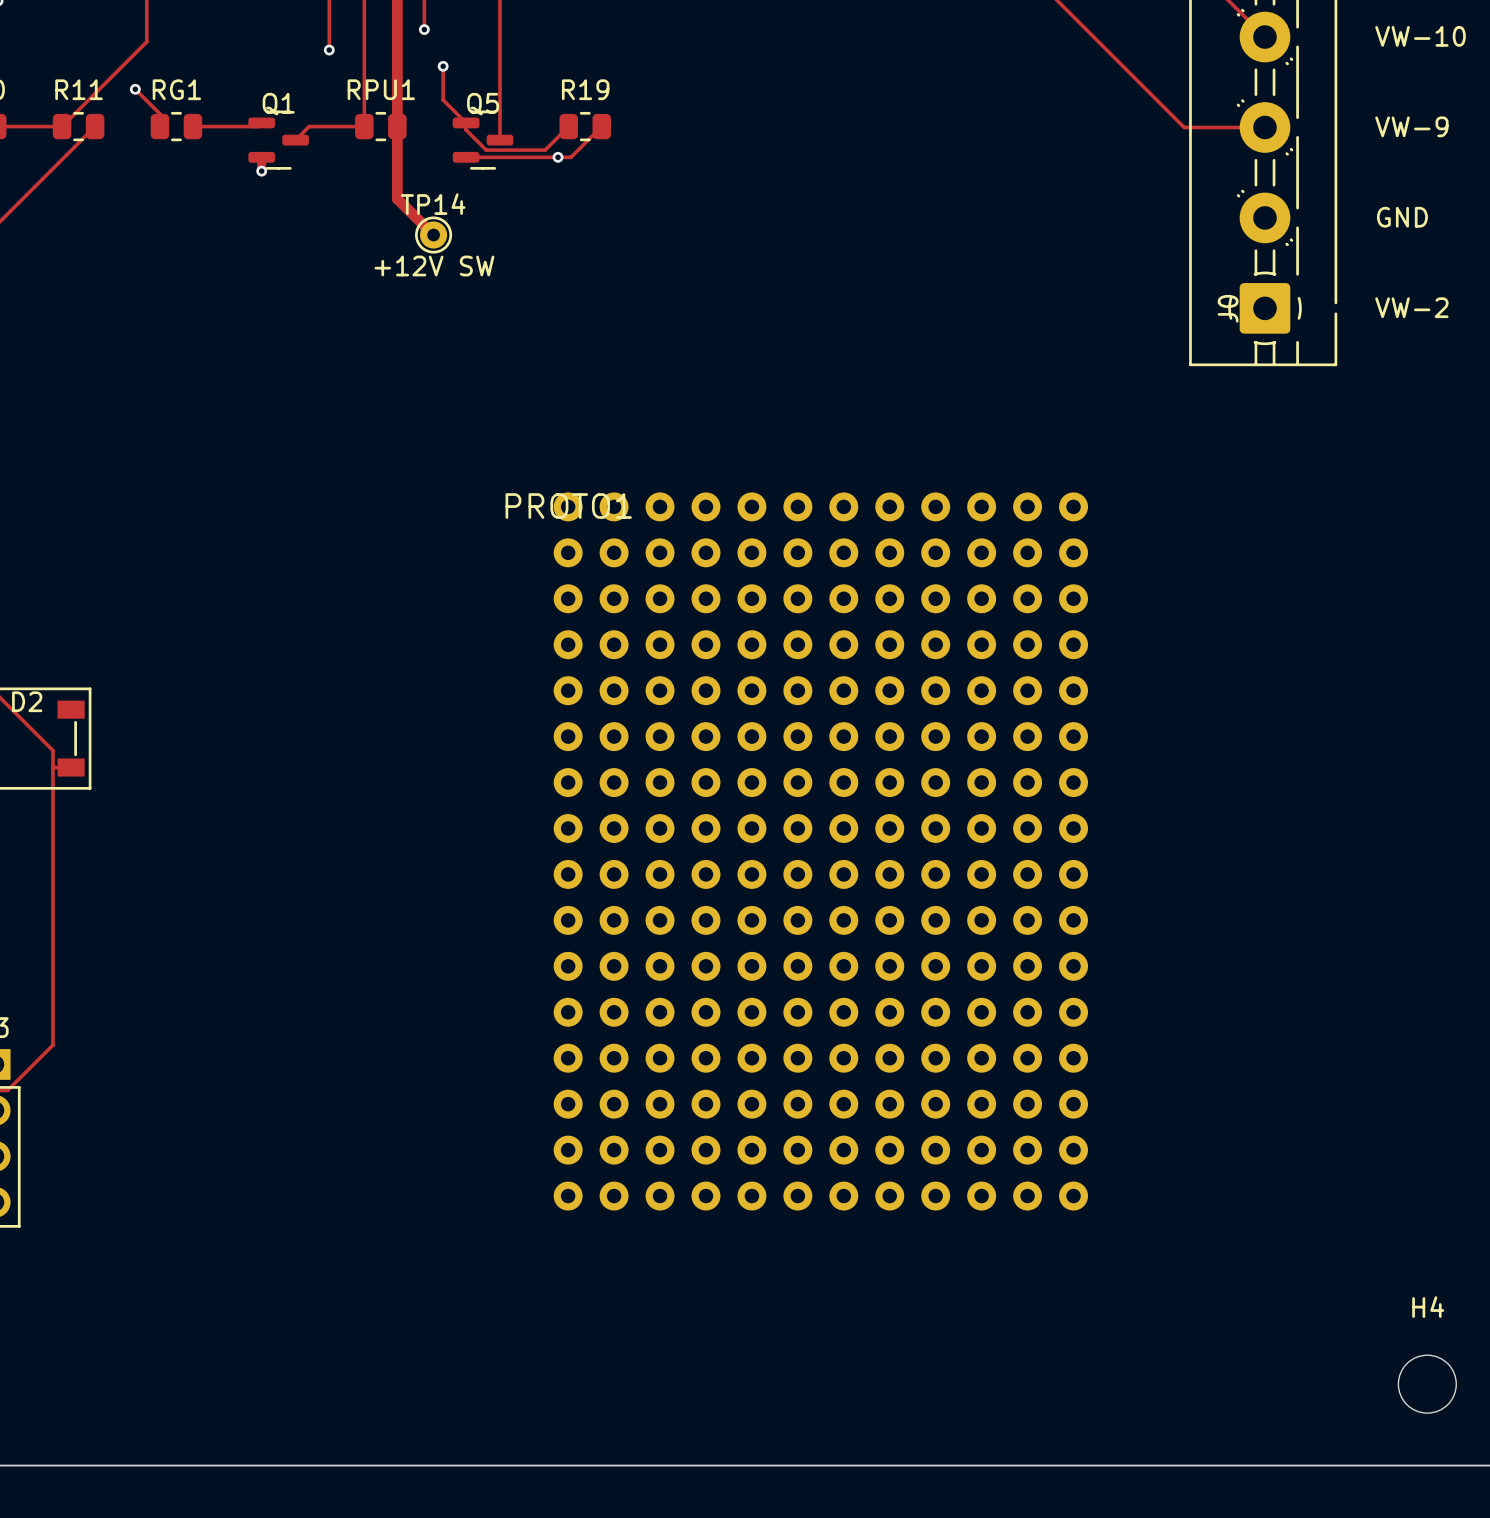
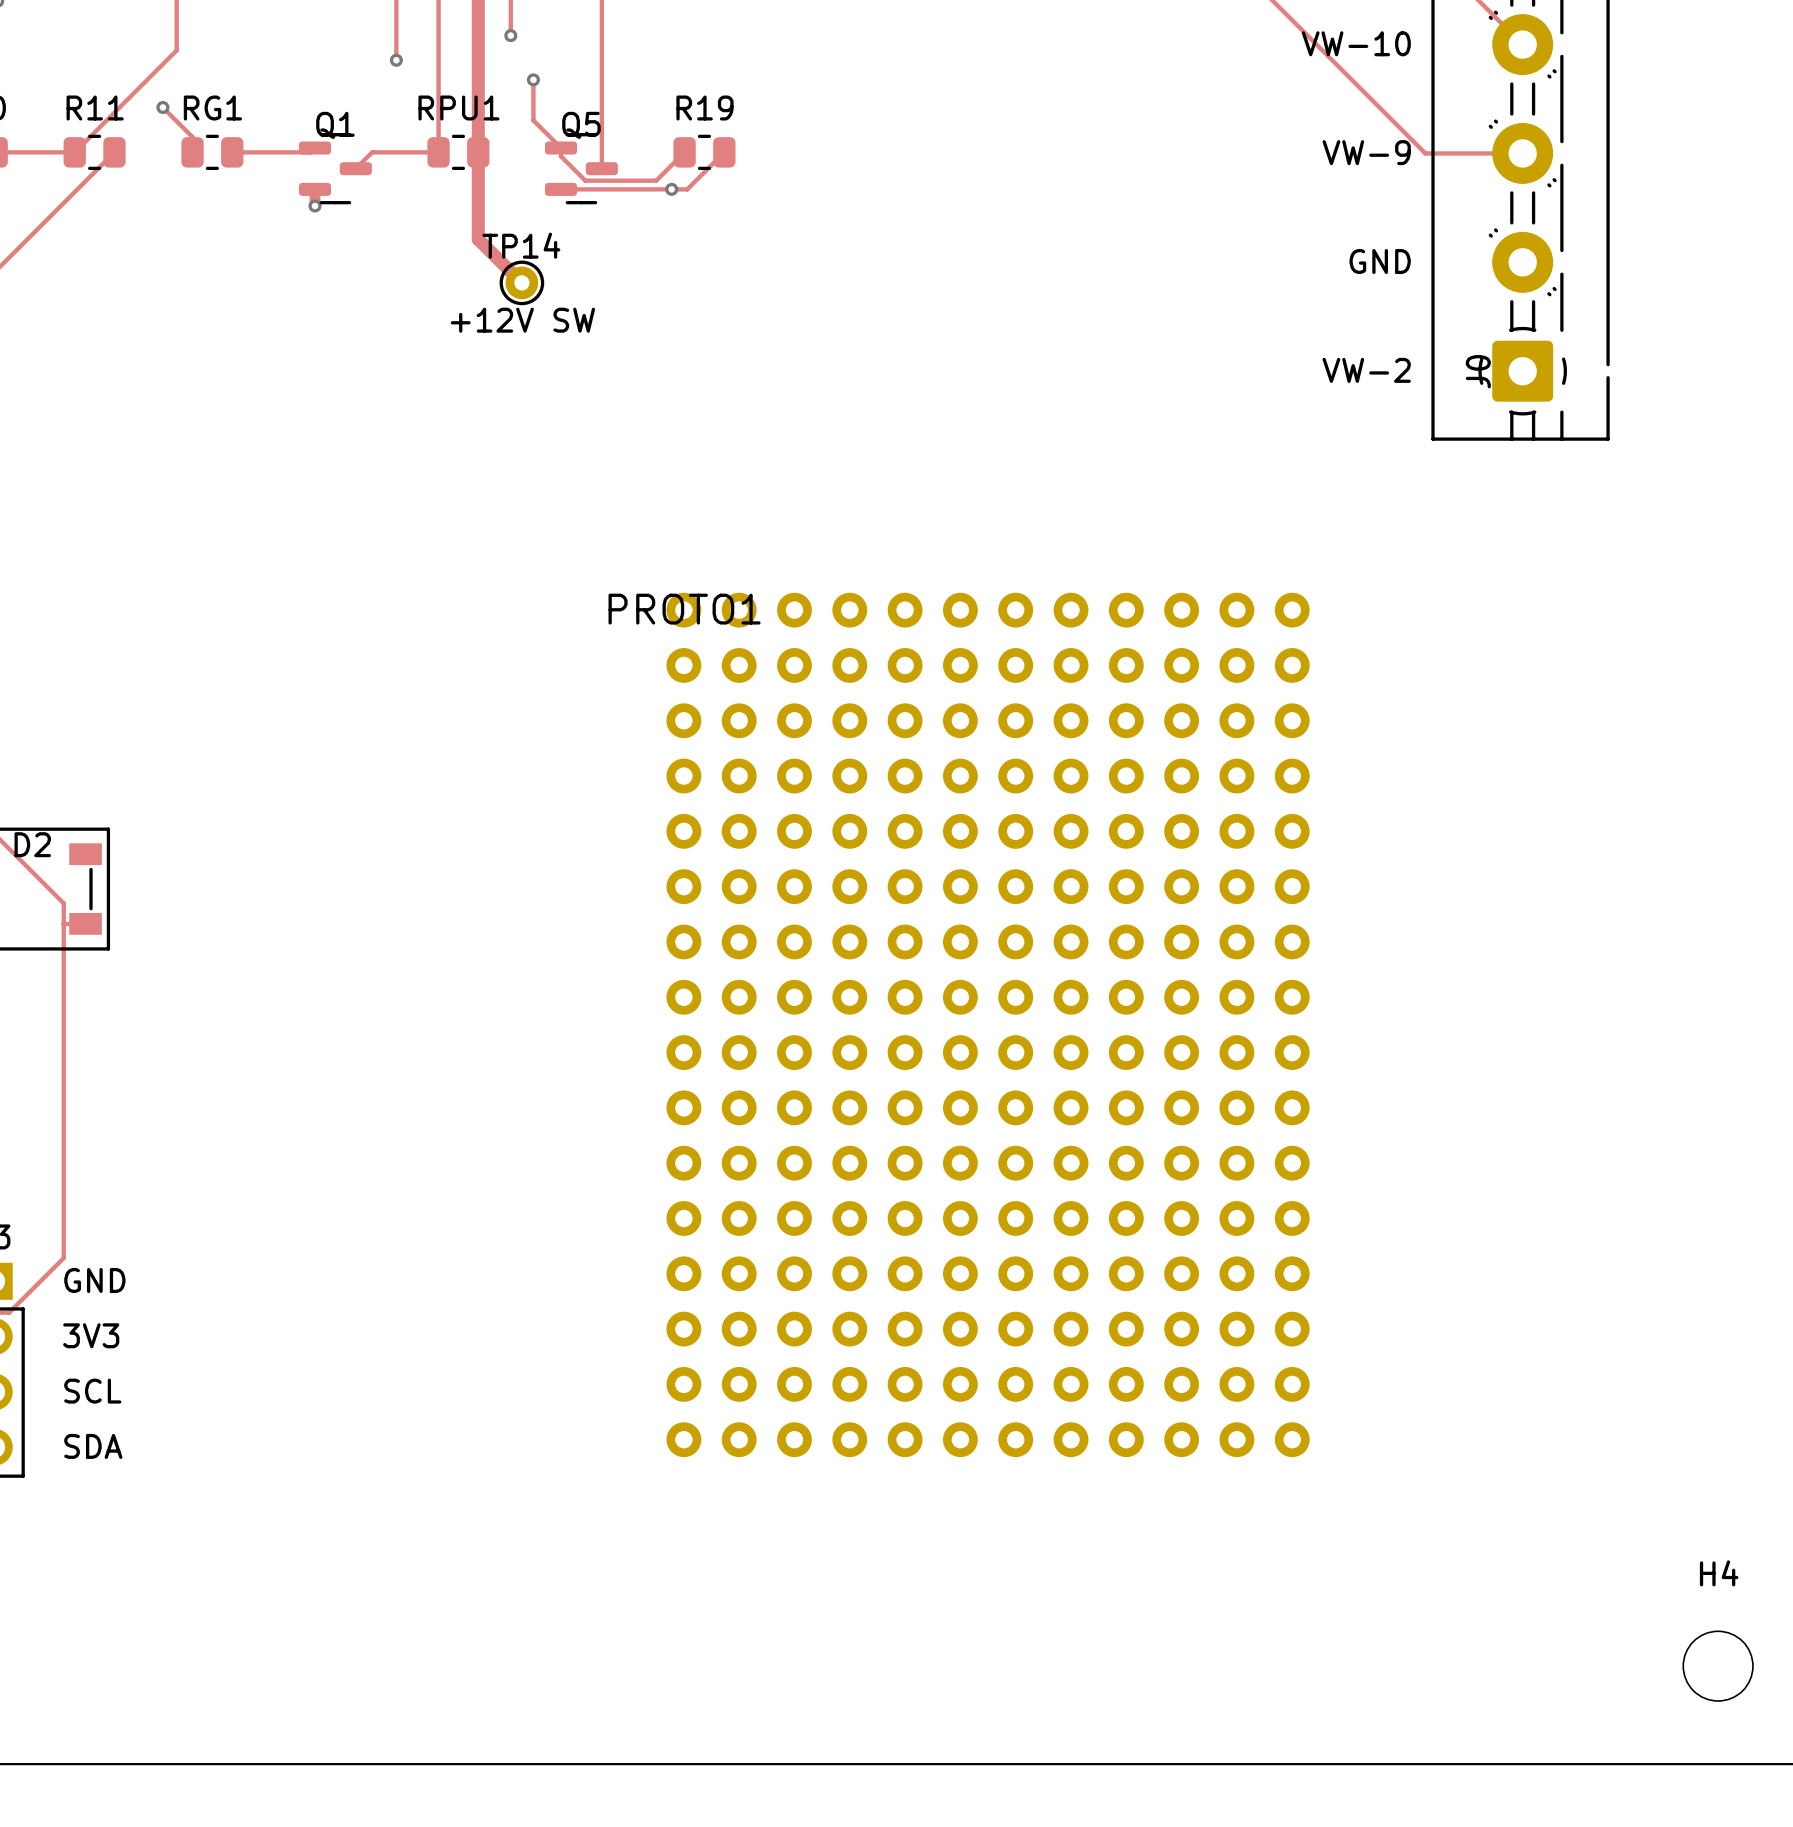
text position: VW-10 (1420, 36) -> VW-10 (1356, 43)
text position: VW-9 (1411, 126) -> VW-9 (1366, 152)
text position: GND (1402, 217) -> GND (1380, 261)
text position: VW-2 (1411, 307) -> VW-2 (1366, 370)
text: none -> GND (94, 1280)
text: none -> 3V3 (91, 1335)
text: none -> SCL (92, 1391)
text: none -> SDA (93, 1446)

